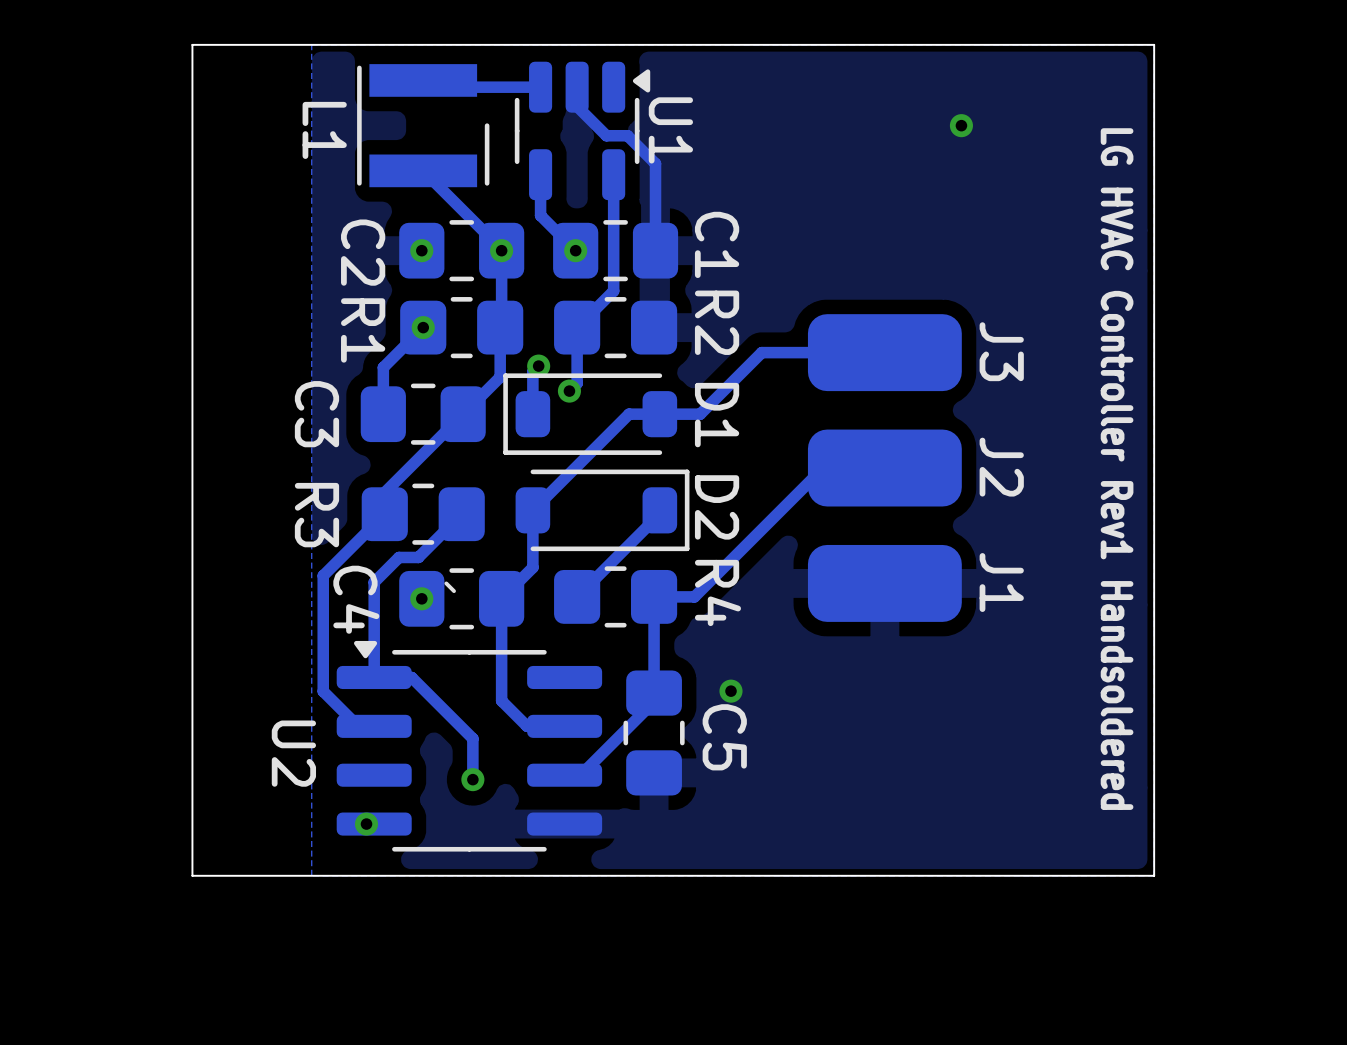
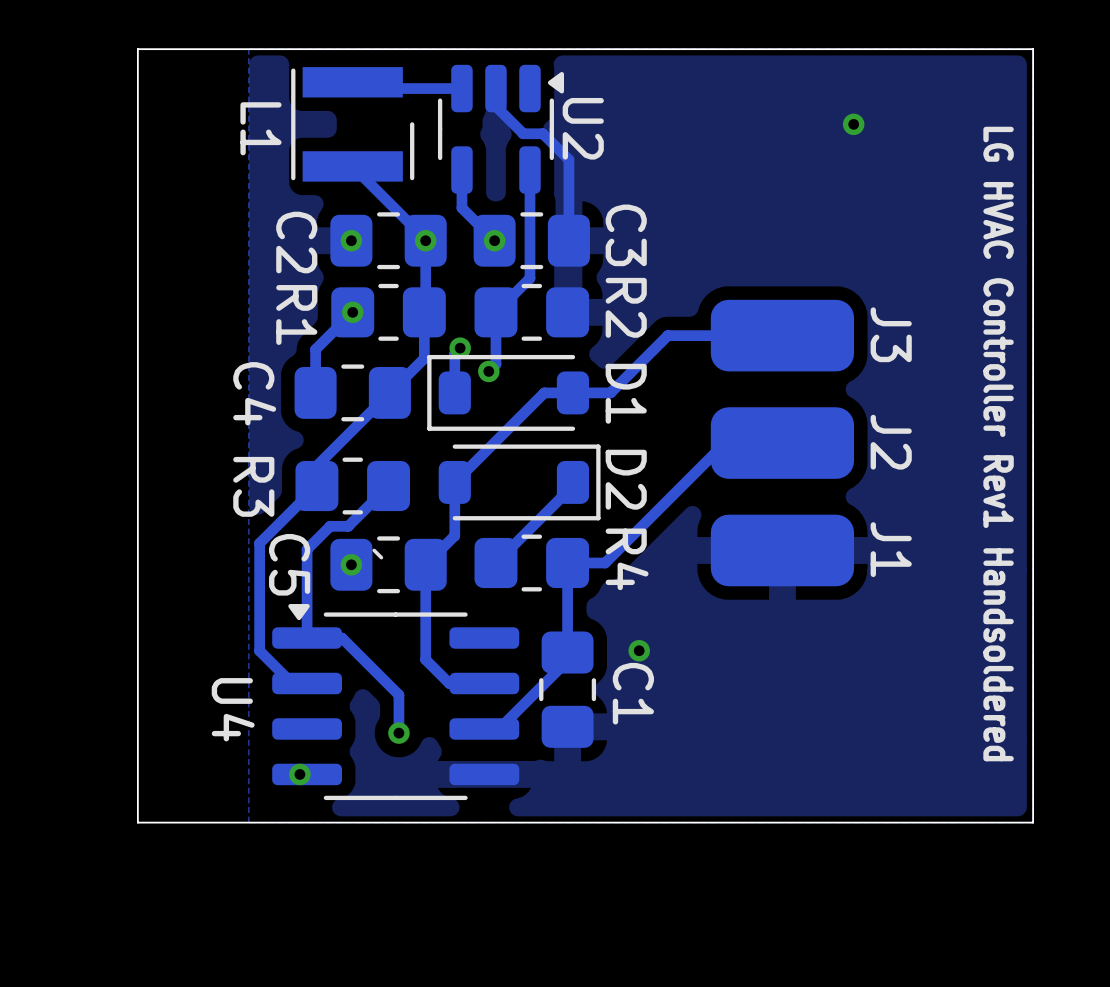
U1 name: U1 (670, 130) -> U2 (583, 128)
C1 name: C1 (717, 244) -> C3 (626, 235)
C3 name: C3 (316, 414) -> C4 (254, 393)
C4 name: C4 (356, 599) -> C5 (289, 564)
C5 name: C5 (724, 737) -> C1 (633, 693)
U2 name: U2 (293, 753) -> U4 (233, 709)

